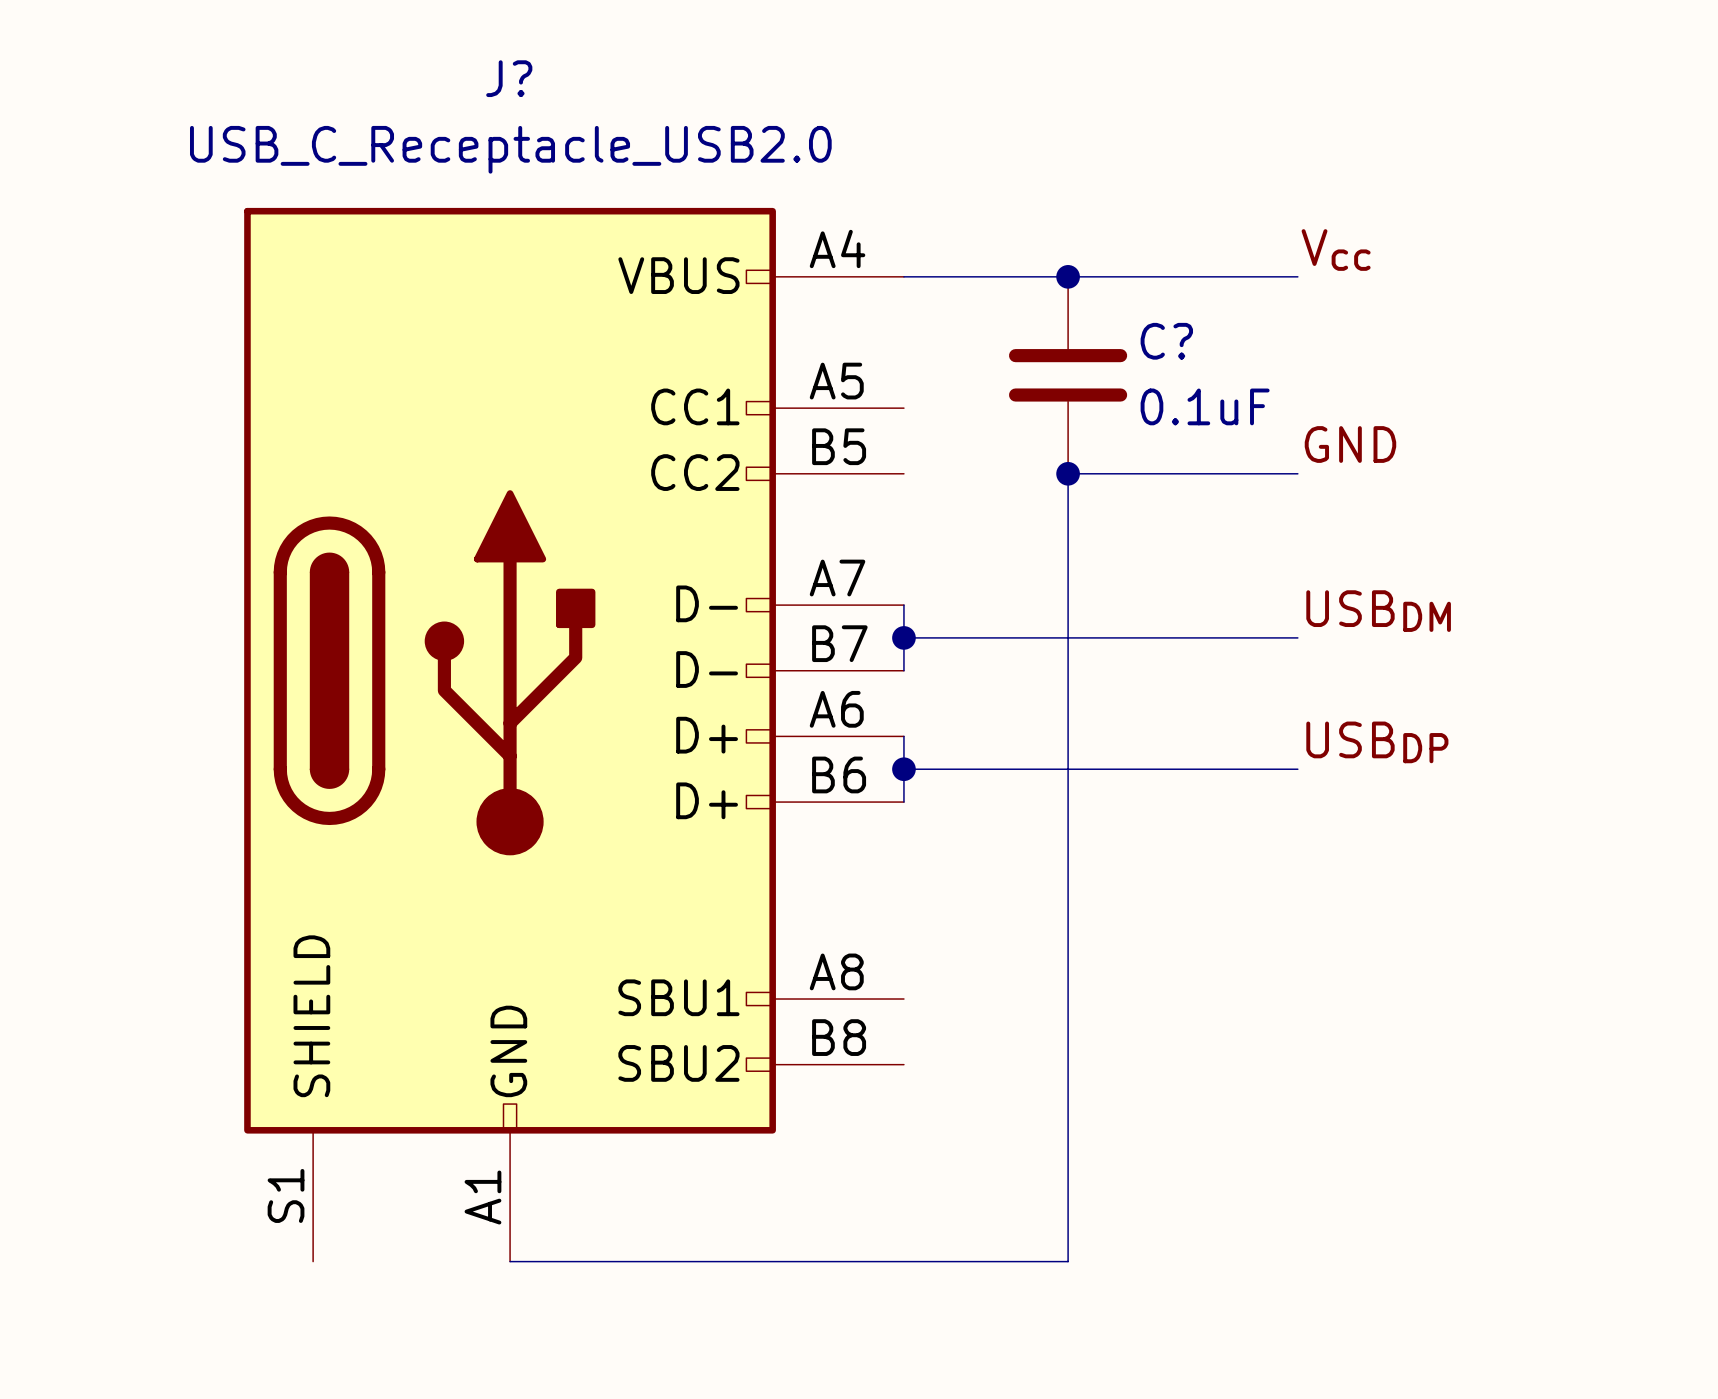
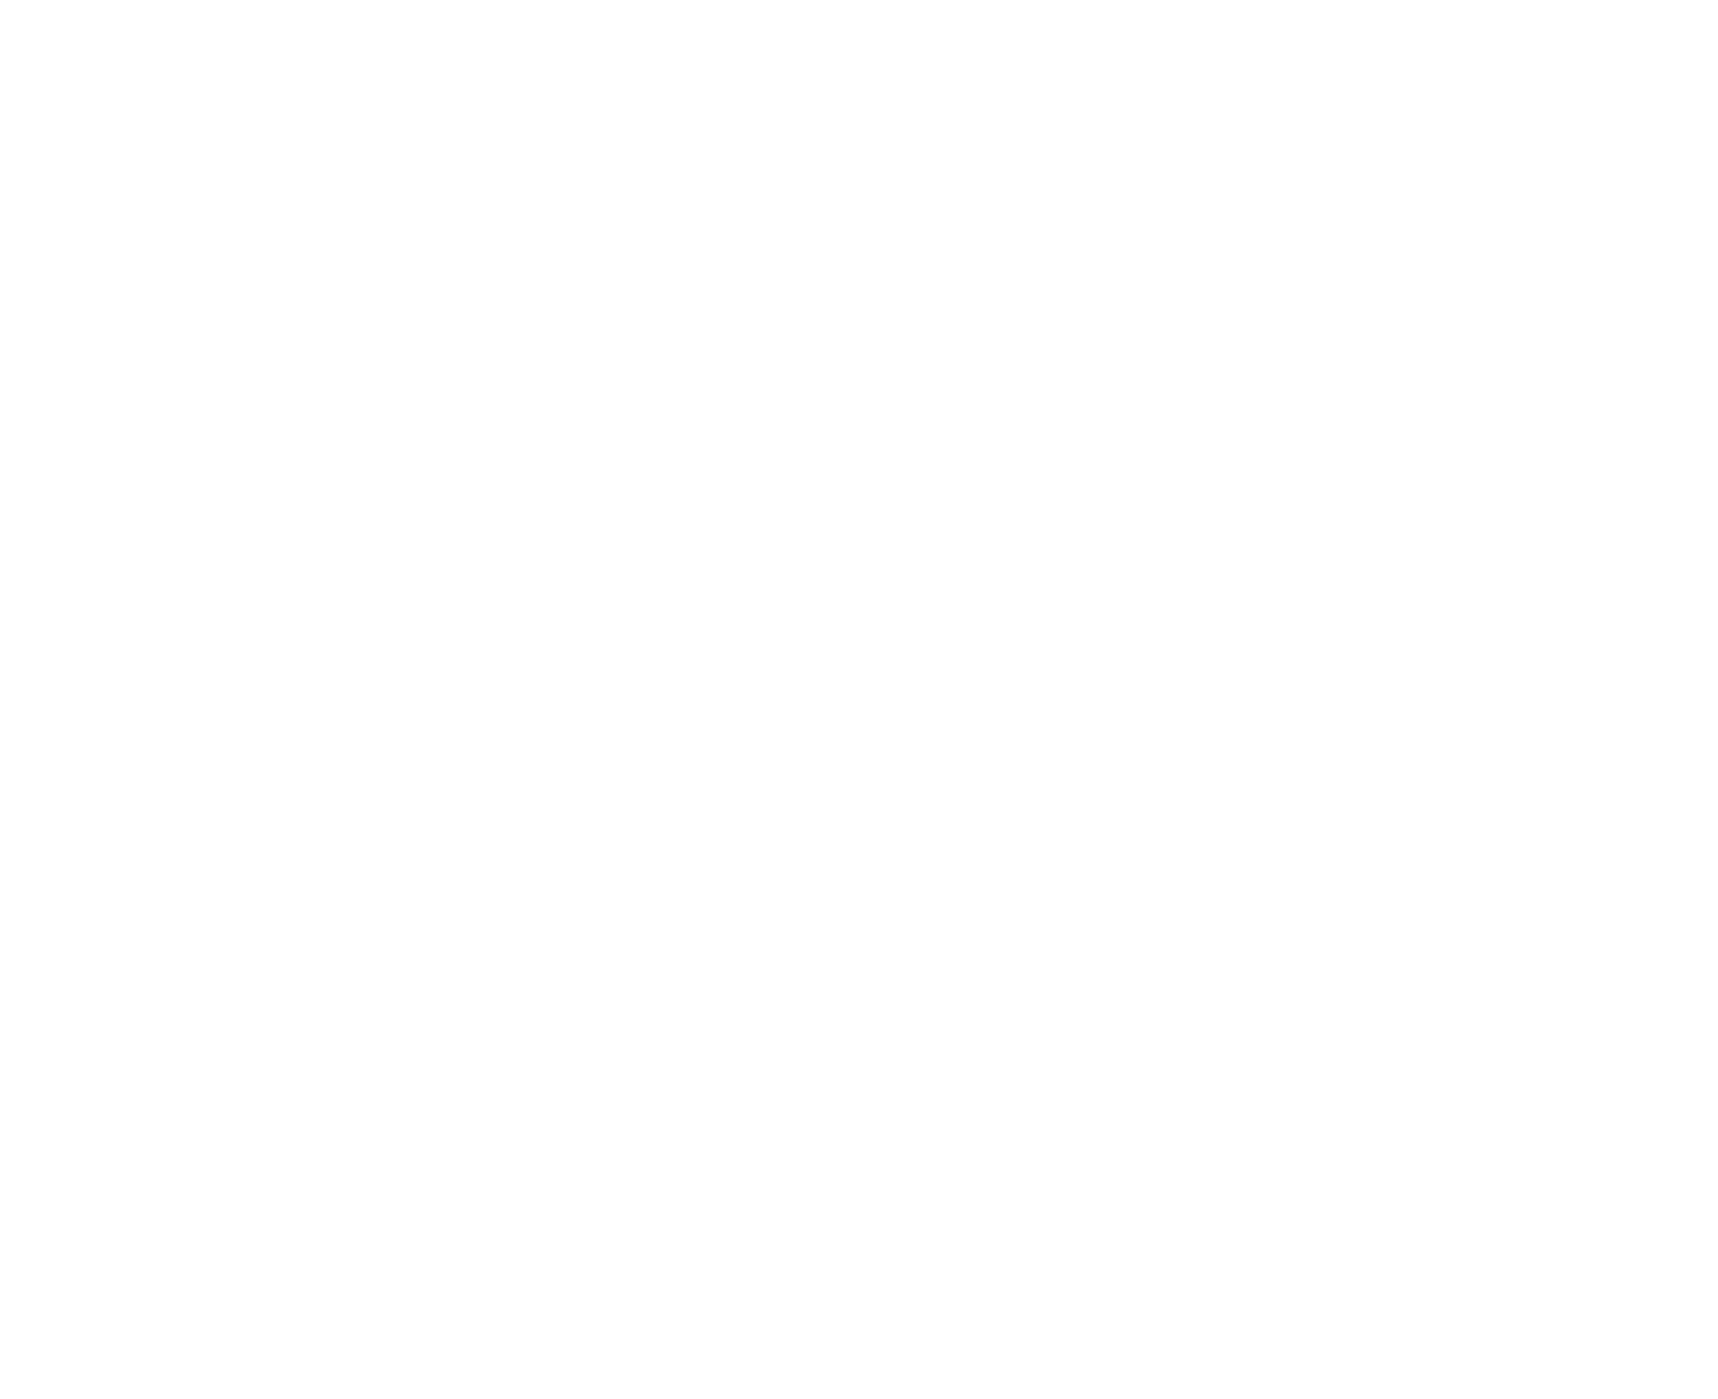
label: Vcc (1336, 250) -> none
wire: (903, 276) (1297, 276) -> none
junction: (1068, 276) -> none
C?: 0.1uF (1068, 375) -> none
label: GND (1350, 444) -> none
junction: (1068, 473) -> none
wire: (1297, 473) (1068, 473) (1068, 1261) (510, 1261) -> none
wire: (903, 605) (903, 670) -> none
label: USBDM (1378, 611) -> none
wire: (903, 637) (1297, 637) -> none
junction: (903, 637) -> none
J?: USB_C_Receptacle_USB2.0 (574, 734) -> none
wire: (903, 736) (903, 802) -> none
label: USBDP (1377, 742) -> none
wire: (903, 769) (1297, 769) -> none
junction: (903, 769) -> none

